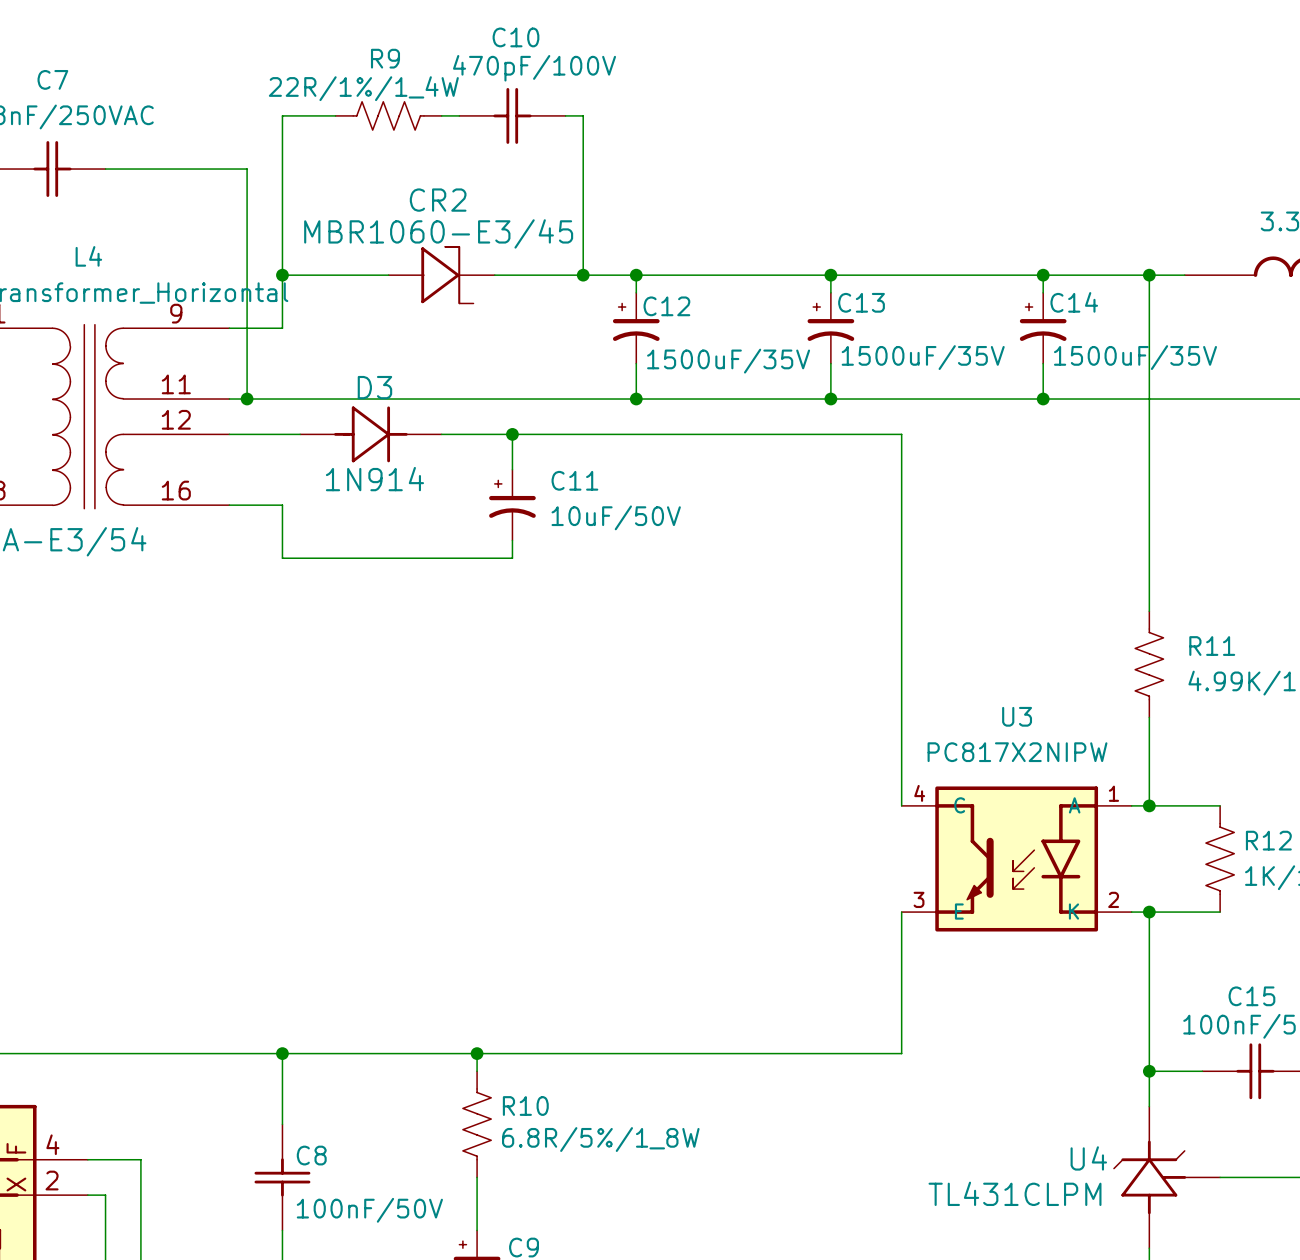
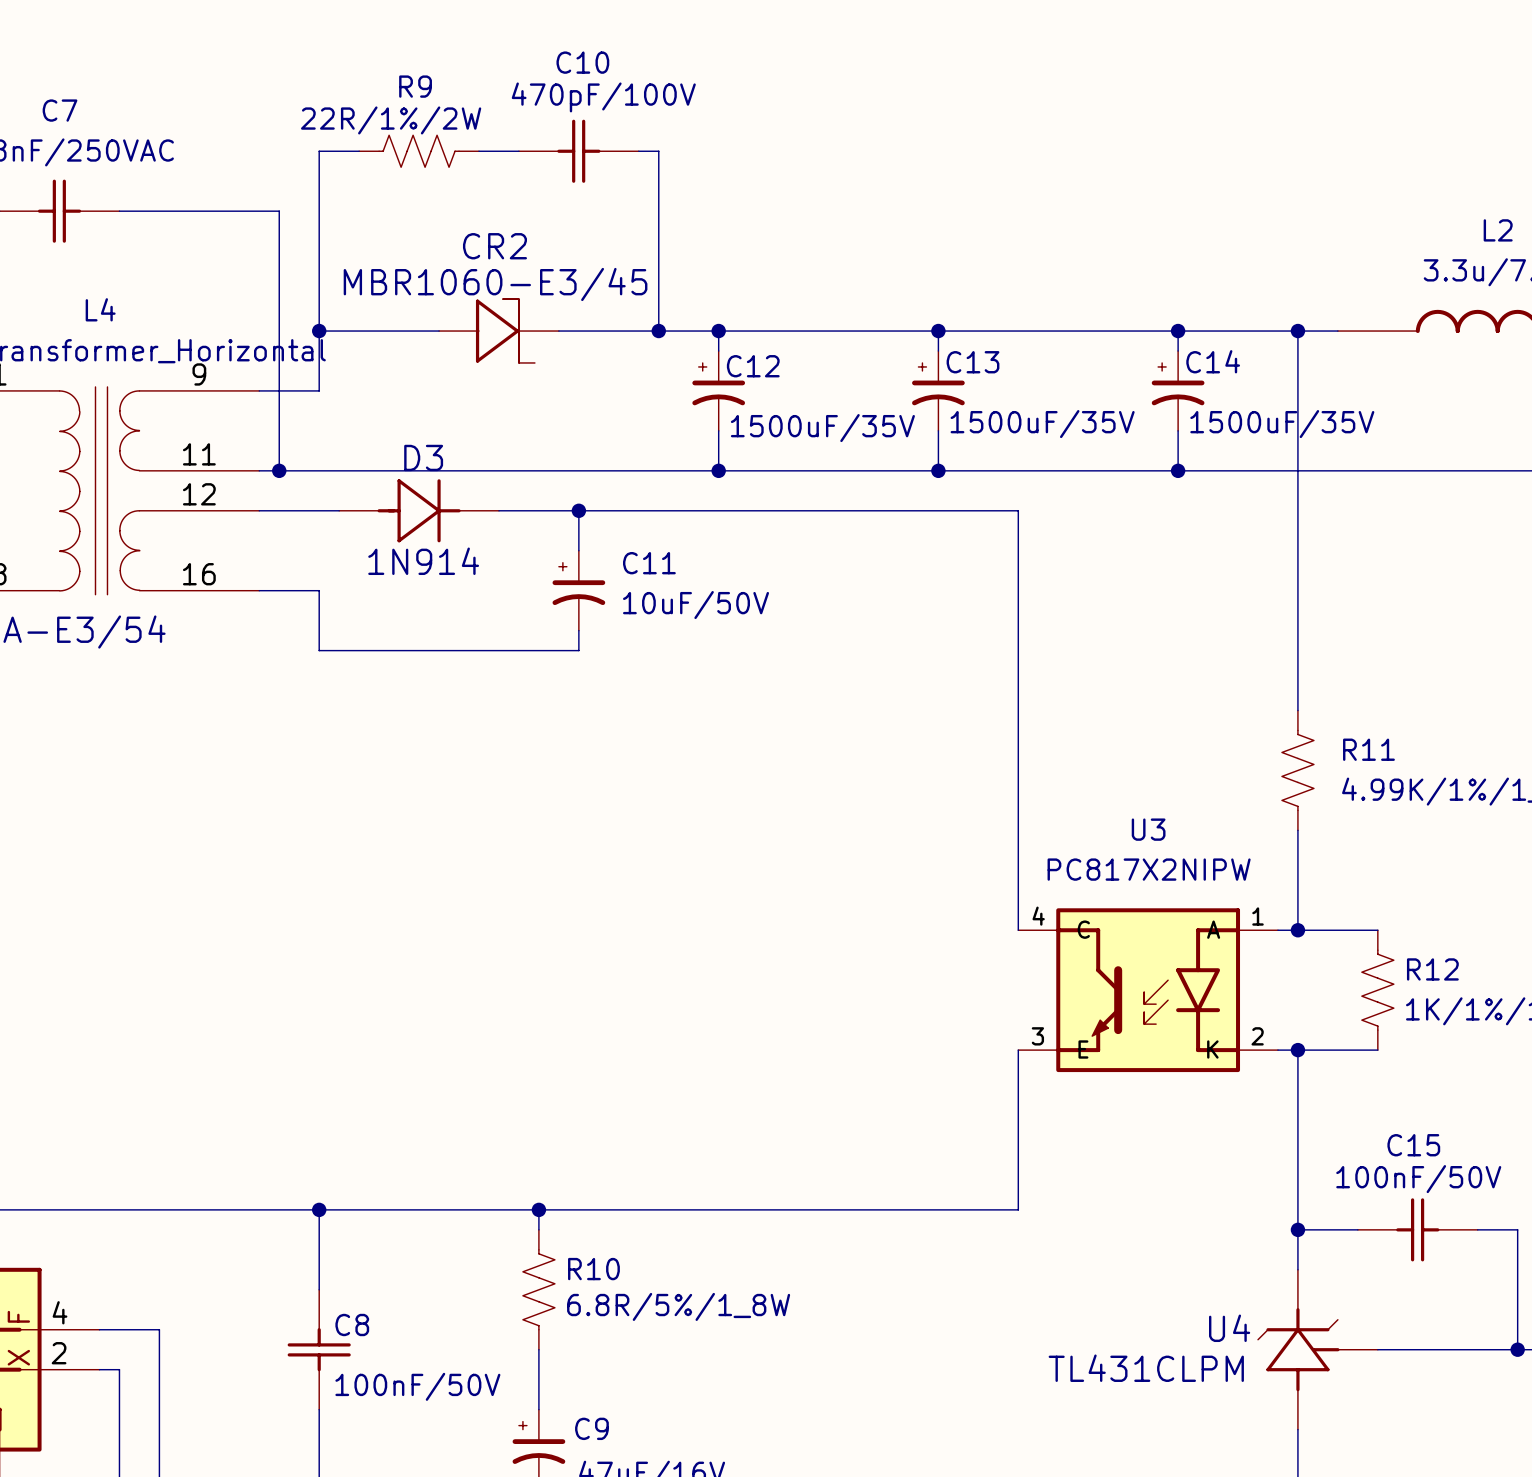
R9 value: 22R/1%/1_4W (363, 88) -> 22R/1%/2W (391, 120)
R9 position: (388, 115) -> (419, 151)

